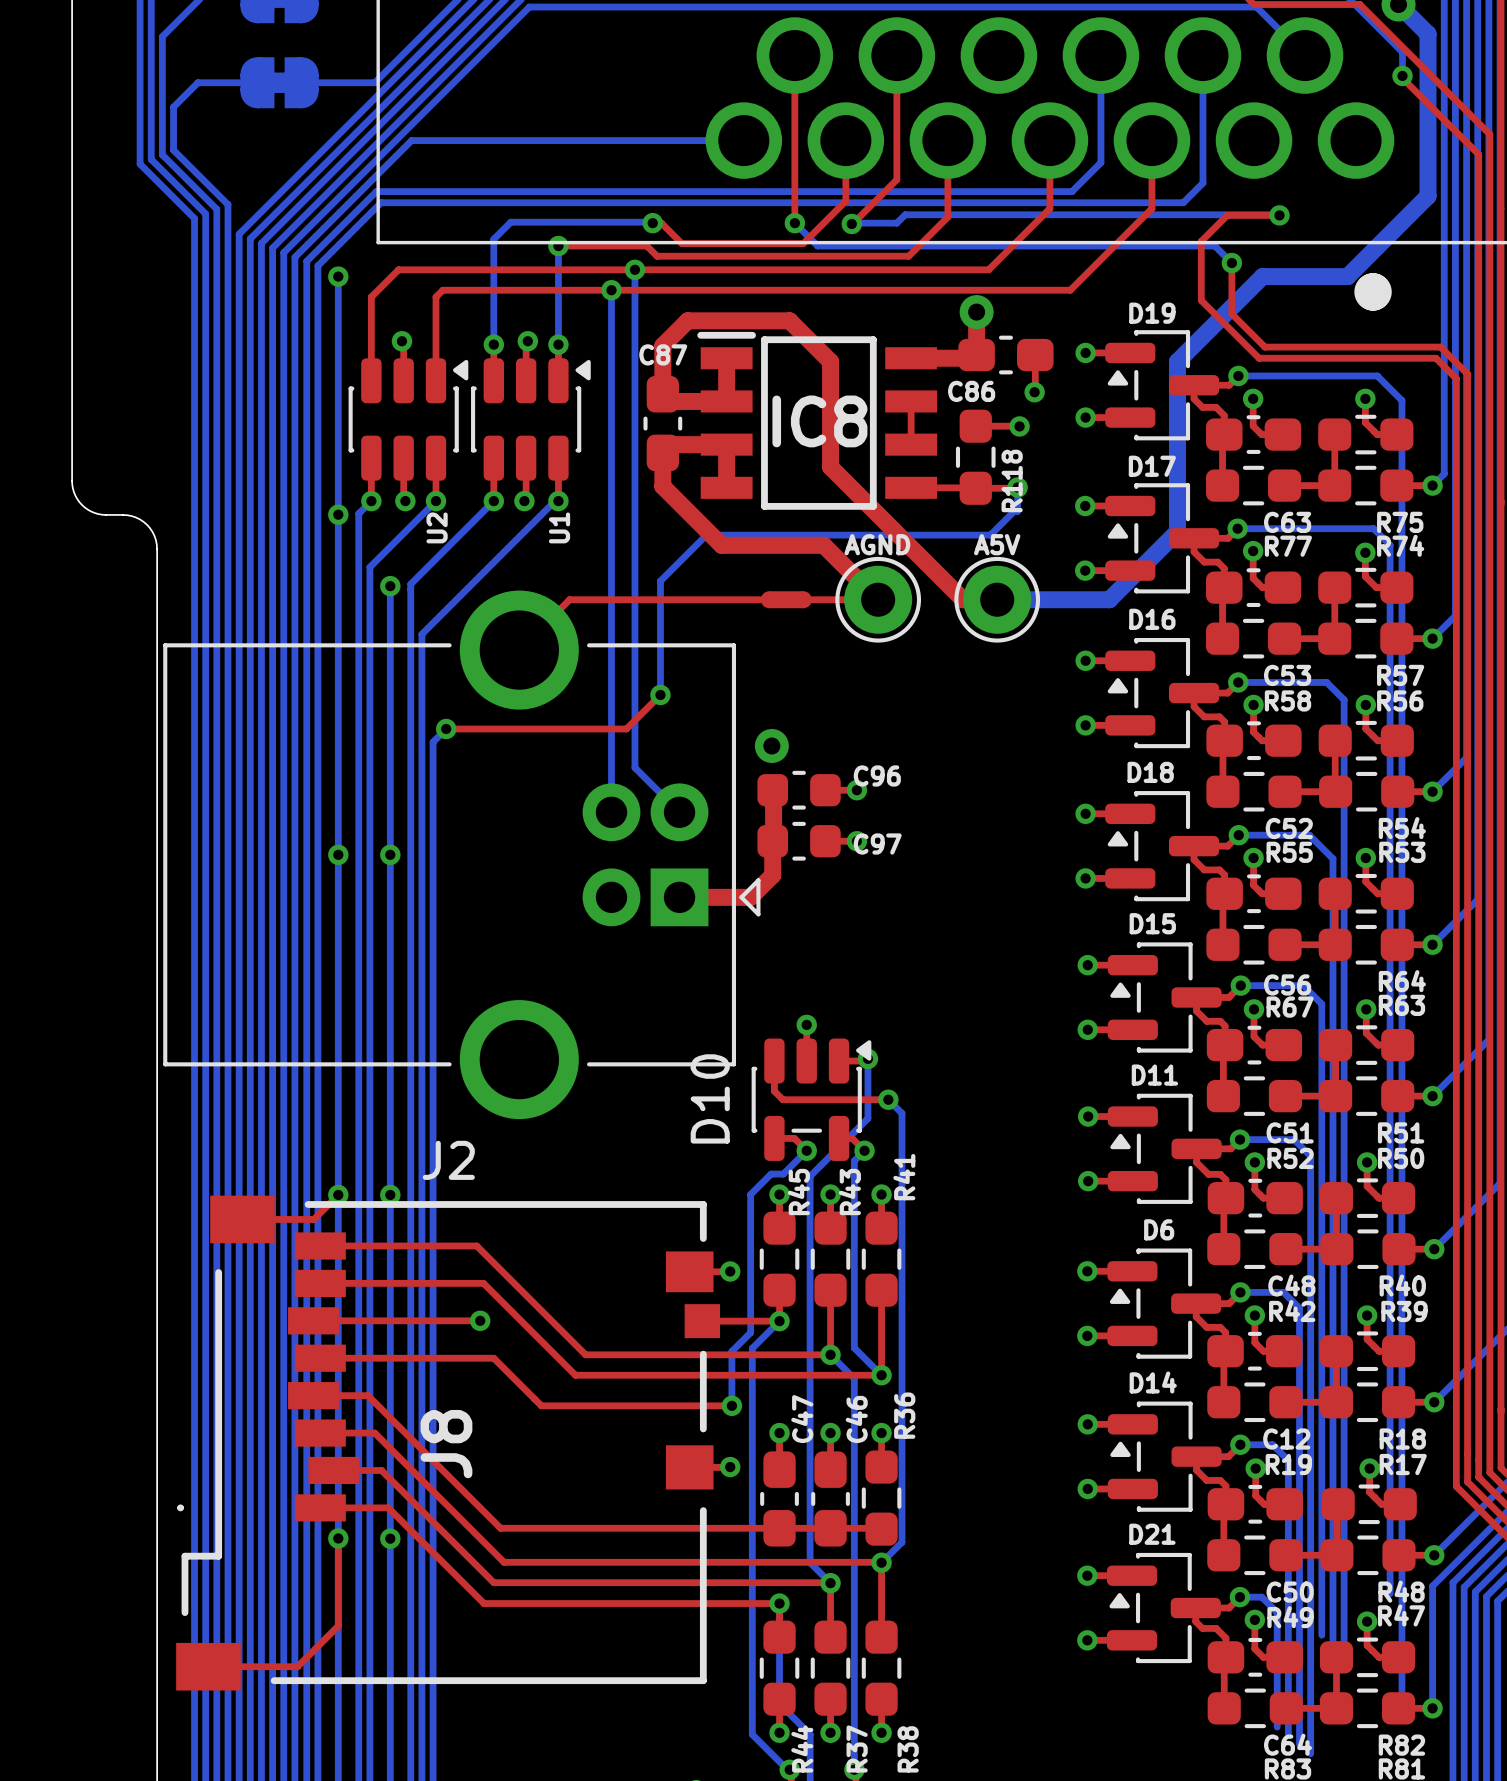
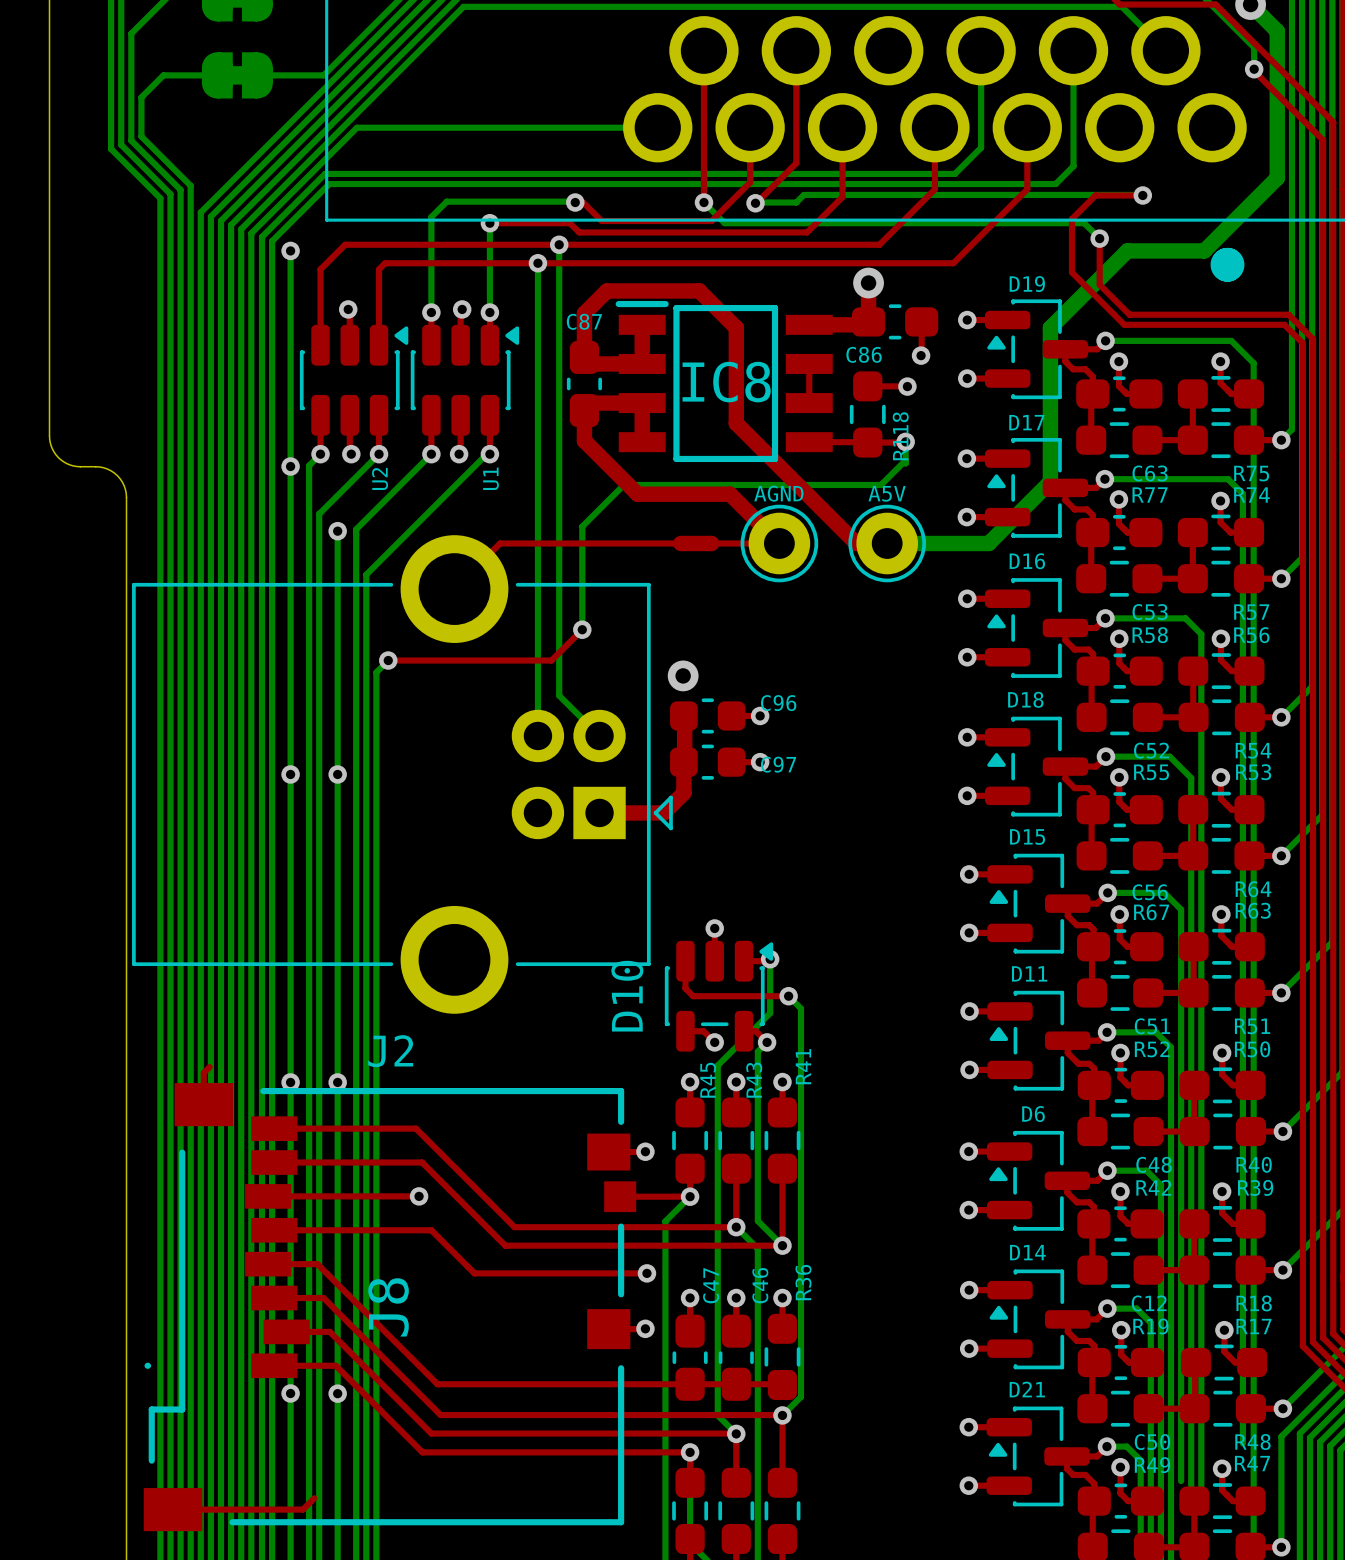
bottom track: (806, 1150) (783, 1174) (771, 1174) (750, 1194) (750, 1332) (731, 1351) (731, 1405) -> none
top track: (338, 1194) (313, 1219) (242, 1219) -> (209, 1067) (203, 1072) (203, 1104)
top track: (338, 1538) (338, 1625) (297, 1666) -> (314, 1498) (302, 1509) (253, 1509)

